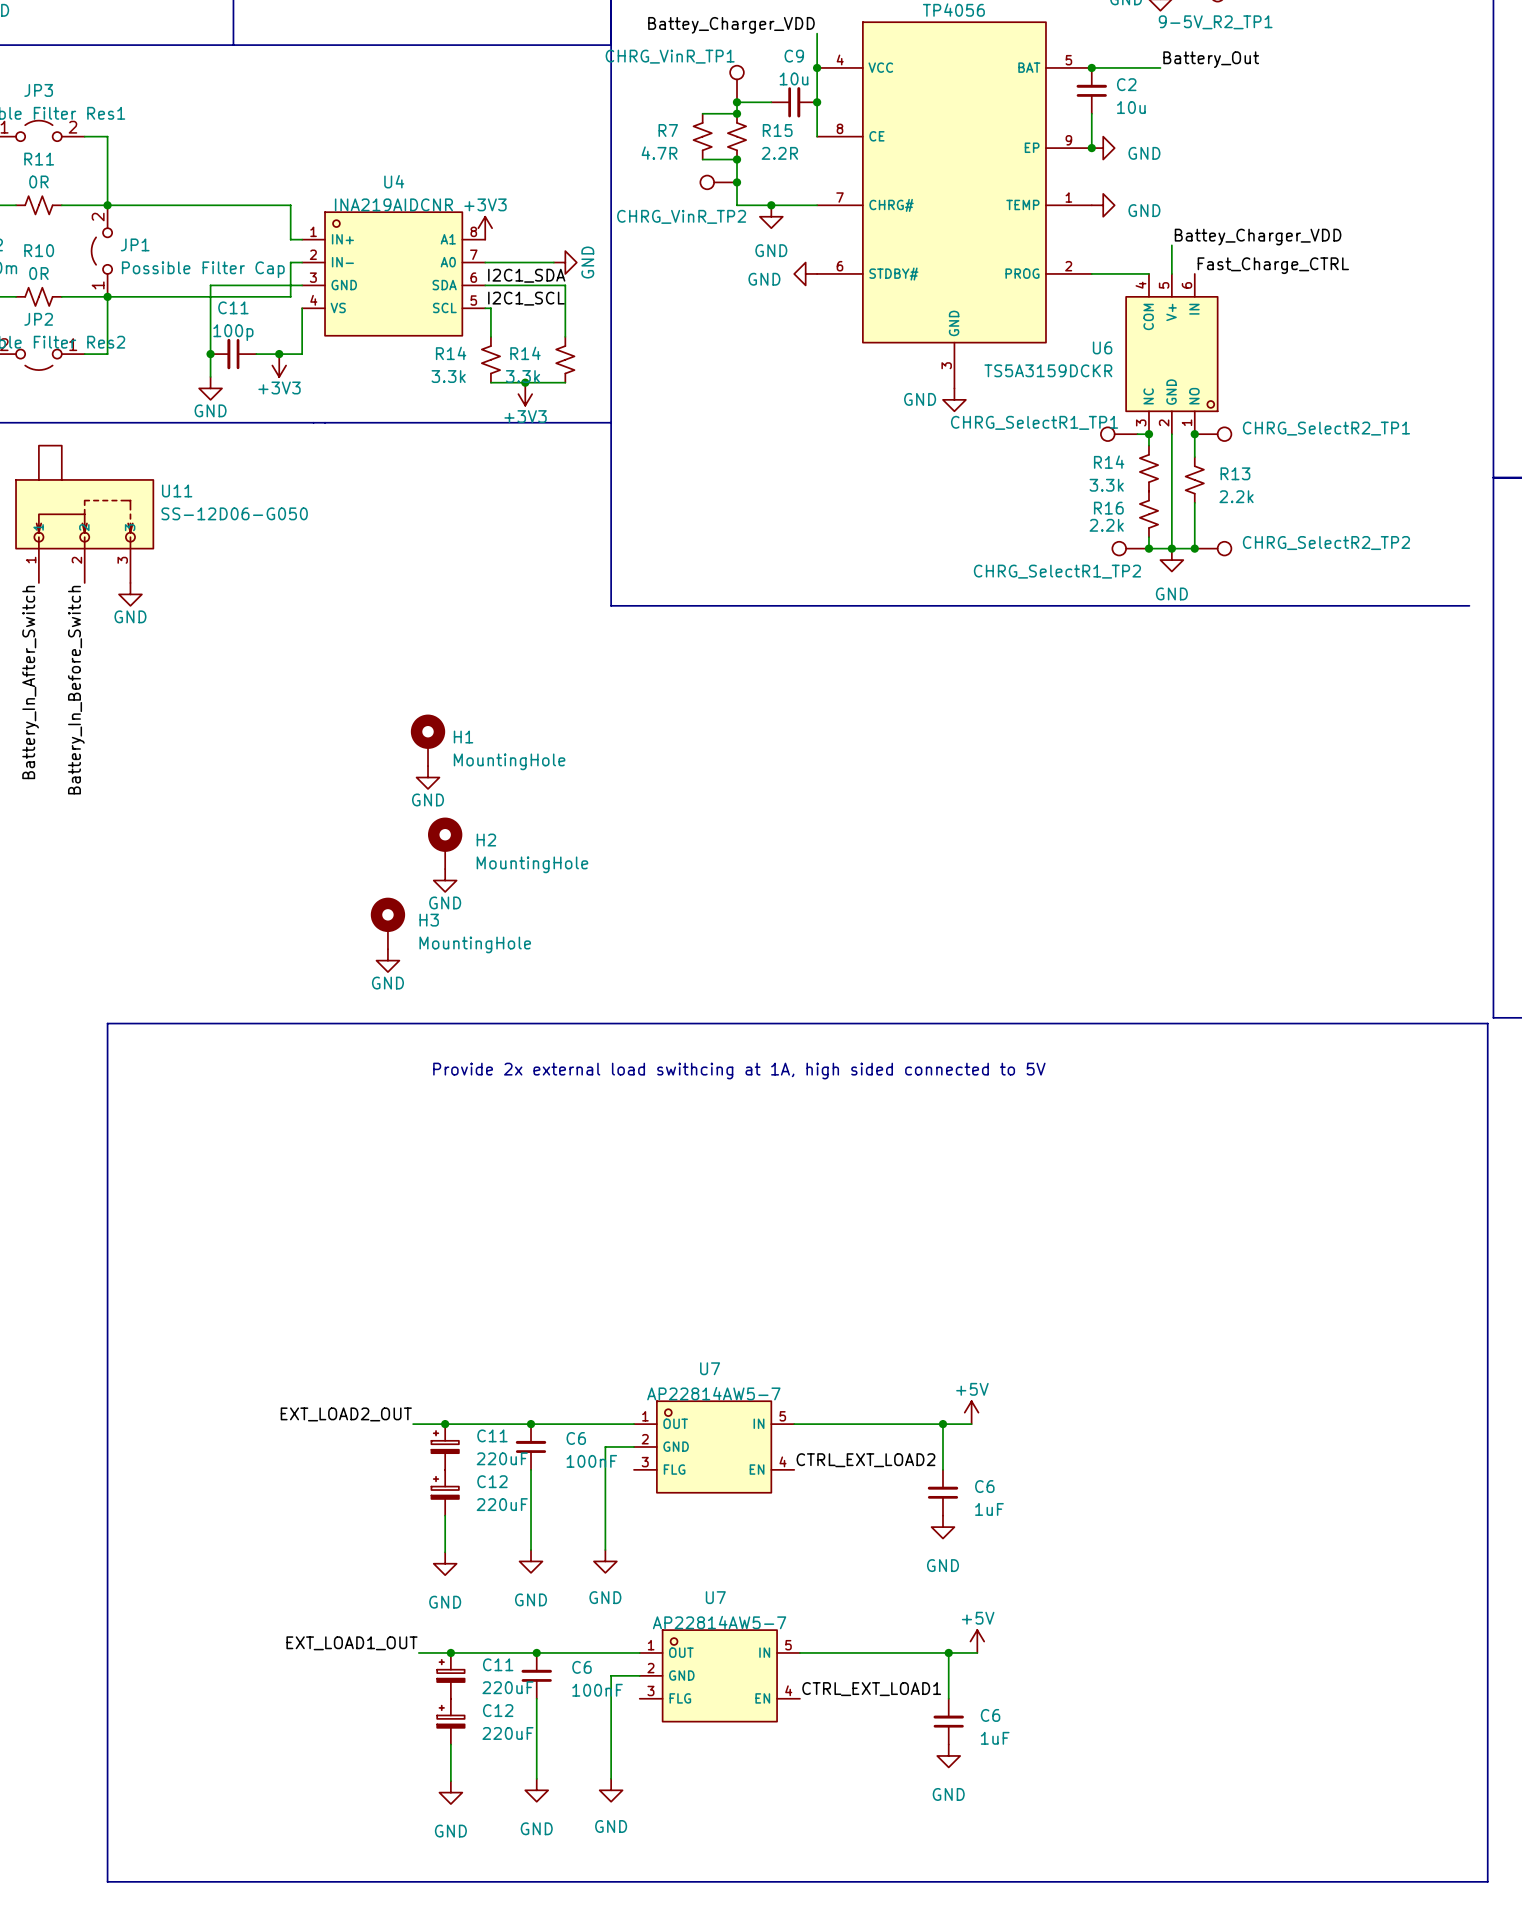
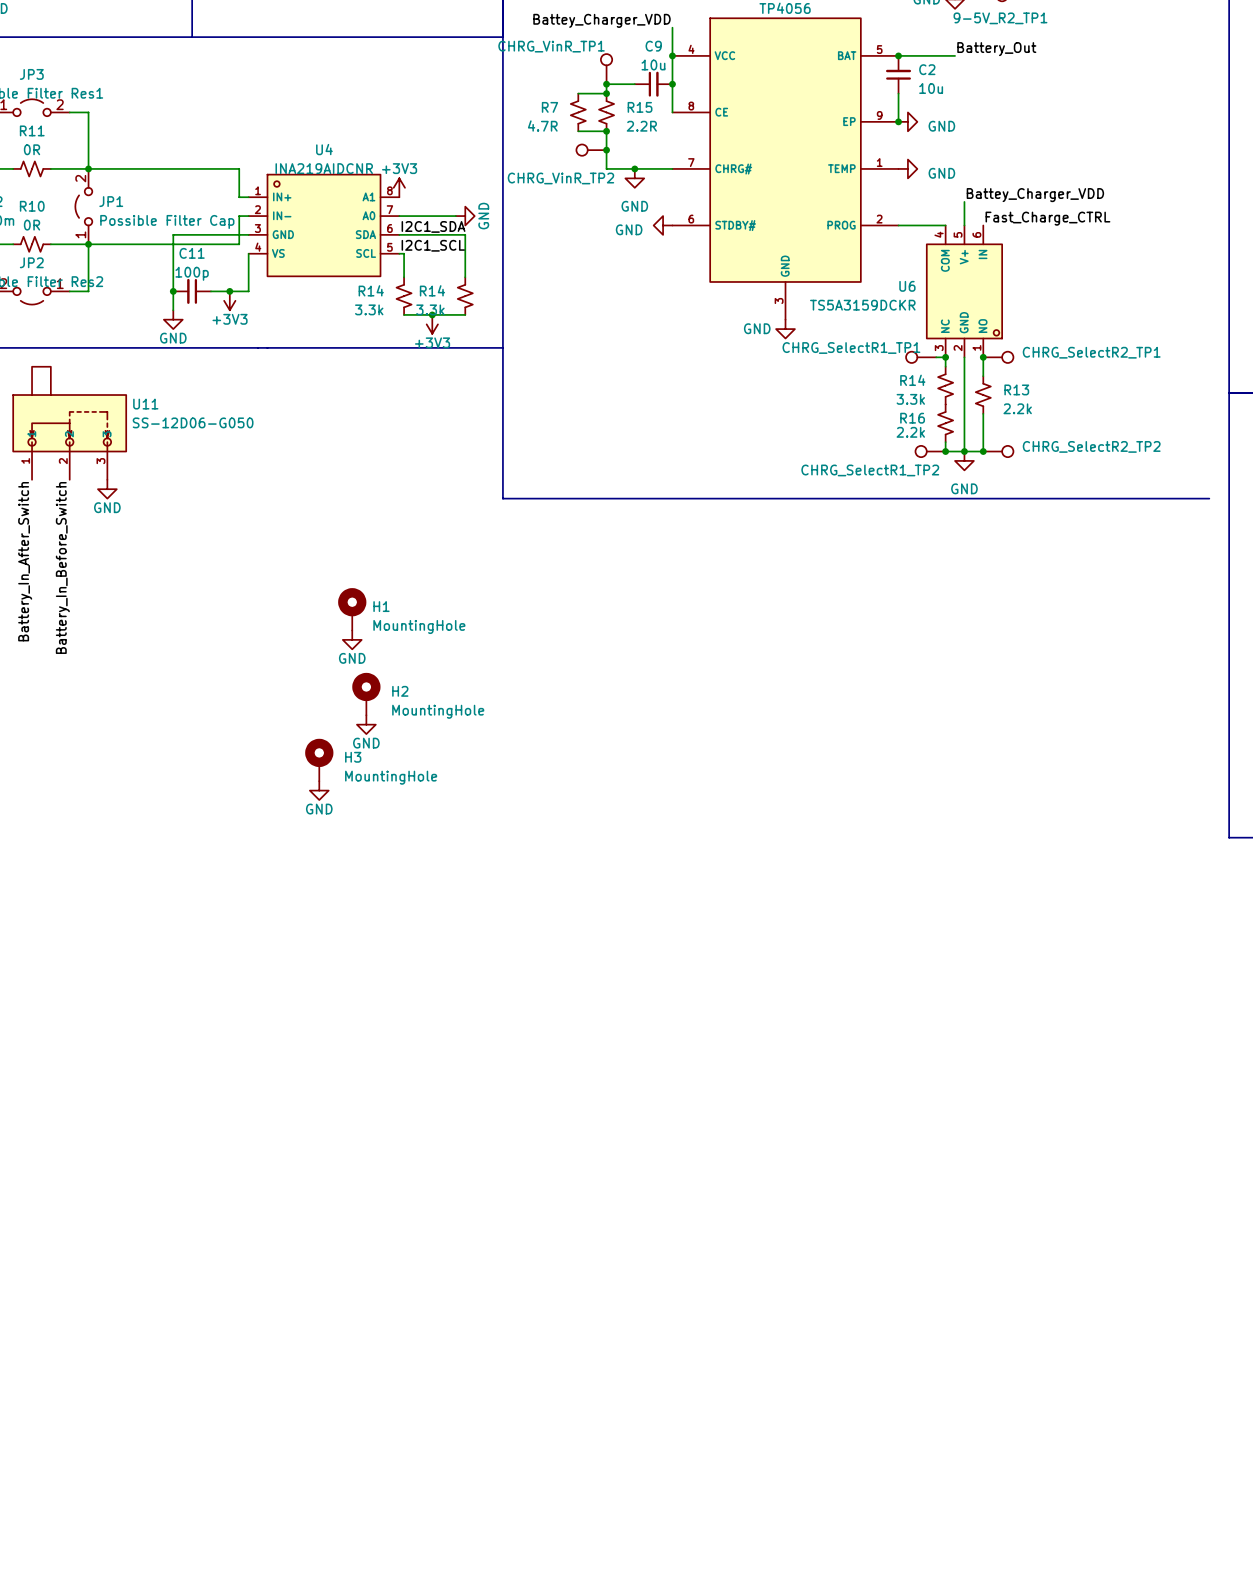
line: (107, 1023) (1487, 1023) (1487, 1881) (107, 1881) (107, 1023) -> none
text: Provide 2x external load swithcing at 1A, high sided connected to 5V (739, 1071) -> none
power symbol: +5V (971, 1412) -> none
label: EXT_LOAD2_OUT (346, 1414) -> none
wire: (413, 1424) (634, 1424) -> none
junction: (445, 1424) -> none
junction: (531, 1424) -> none
wire: (794, 1424) (971, 1424) -> none
wire: (942, 1424) (942, 1469) -> none
junction: (942, 1424) -> none
C11: 220uF (445, 1446) -> none
C6: 100nF (531, 1446) -> none
wire: (634, 1446) (605, 1446) (605, 1549) -> none
U7: AP22814AW5-7 (714, 1446) -> none
label: CTRL_EXT_LOAD2 (865, 1460) -> none
wire: (531, 1469) (531, 1549) -> none
C12: 220uF (445, 1492) -> none
C6: 1uF (942, 1492) -> none
wire: (445, 1515) (445, 1552) -> none
power symbol: GND (942, 1527) -> none
power symbol: GND (531, 1561) -> none
power symbol: GND (605, 1561) -> none
power symbol: GND (445, 1563) -> none
power symbol: +5V (977, 1641) -> none
label: EXT_LOAD1_OUT (352, 1643) -> none
wire: (418, 1652) (639, 1652) -> none
junction: (450, 1652) -> none
junction: (536, 1652) -> none
wire: (799, 1652) (977, 1652) -> none
wire: (948, 1652) (948, 1698) -> none
junction: (948, 1652) -> none
C11: 220uF (450, 1675) -> none
C6: 100nF (536, 1675) -> none
wire: (639, 1675) (611, 1675) (611, 1778) -> none
U7: AP22814AW5-7 (719, 1675) -> none
label: CTRL_EXT_LOAD1 (871, 1689) -> none
wire: (536, 1698) (536, 1778) -> none
C12: 220uF (450, 1721) -> none
C6: 1uF (948, 1721) -> none
wire: (450, 1744) (450, 1781) -> none
power symbol: GND (948, 1755) -> none
power symbol: GND (536, 1790) -> none
power symbol: GND (611, 1790) -> none
power symbol: GND (450, 1792) -> none

